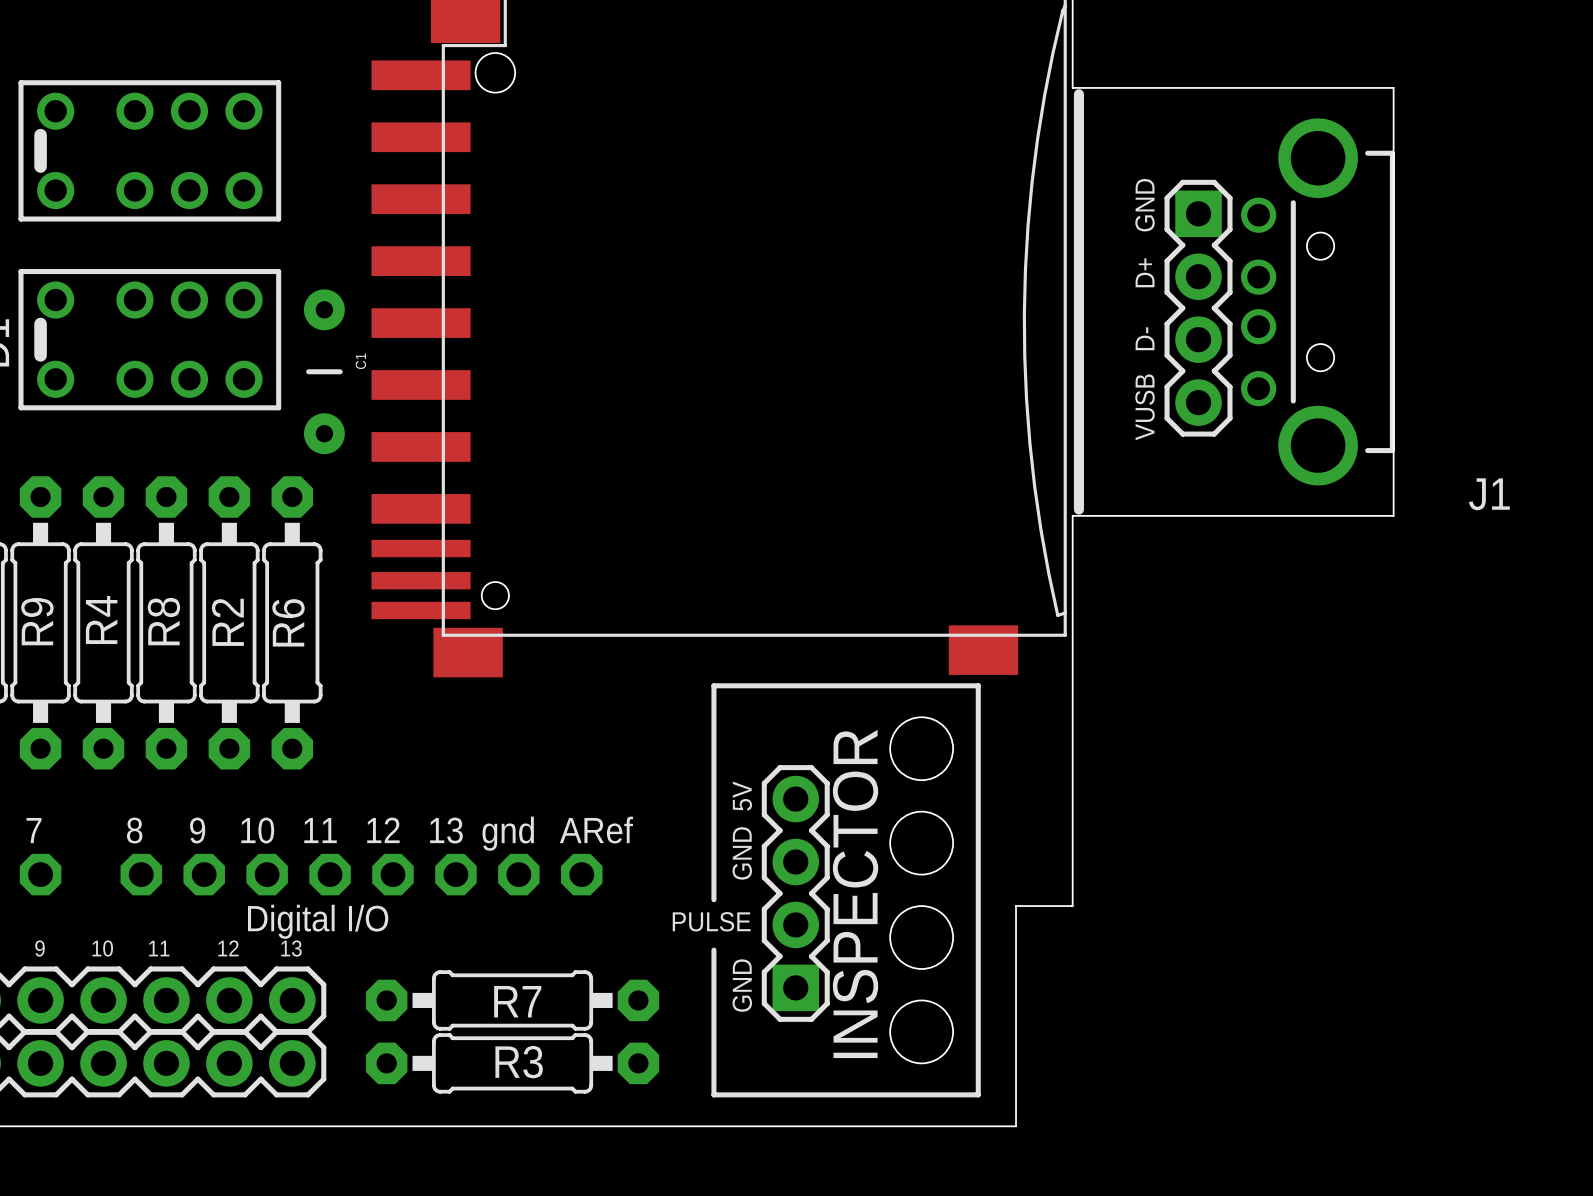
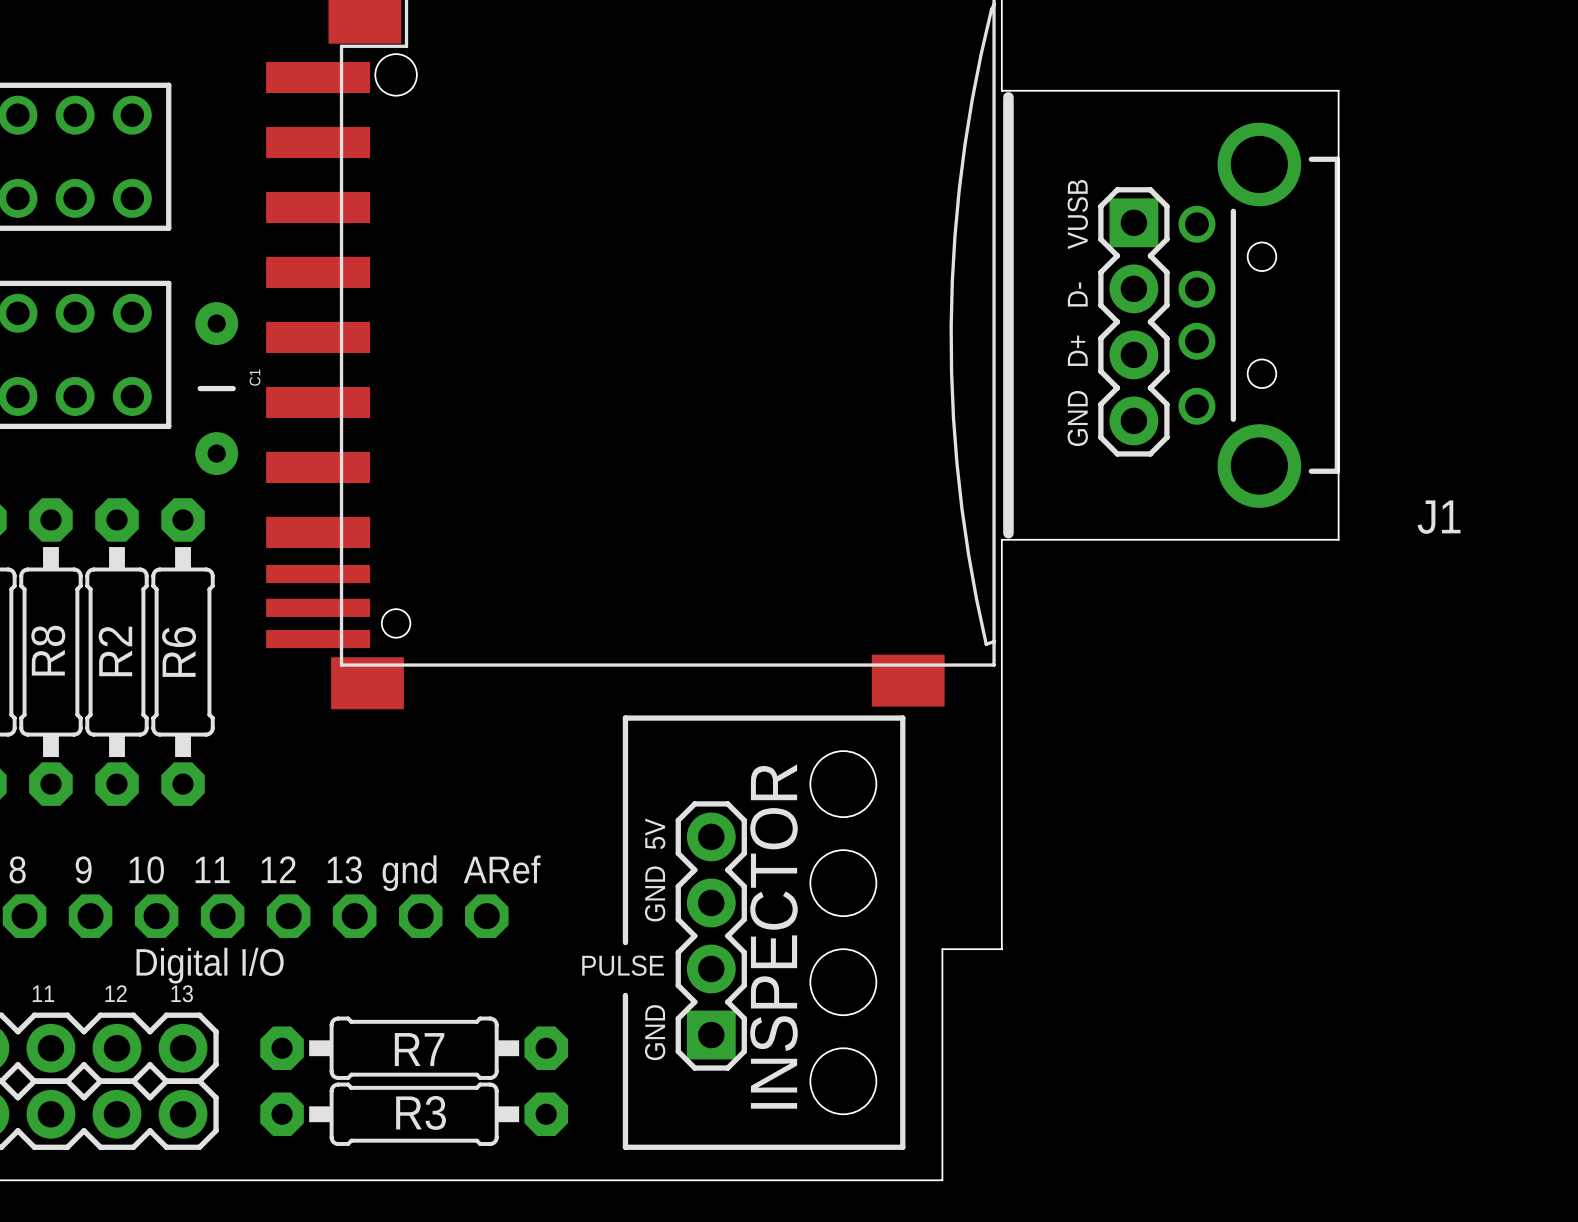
text: GND (1145, 205) -> VUSB (1077, 214)
text: D+ (1145, 272) -> D- (1077, 294)
text: D- (1145, 338) -> D+ (1077, 350)
text: VUSB (1145, 407) -> GND (1077, 418)

